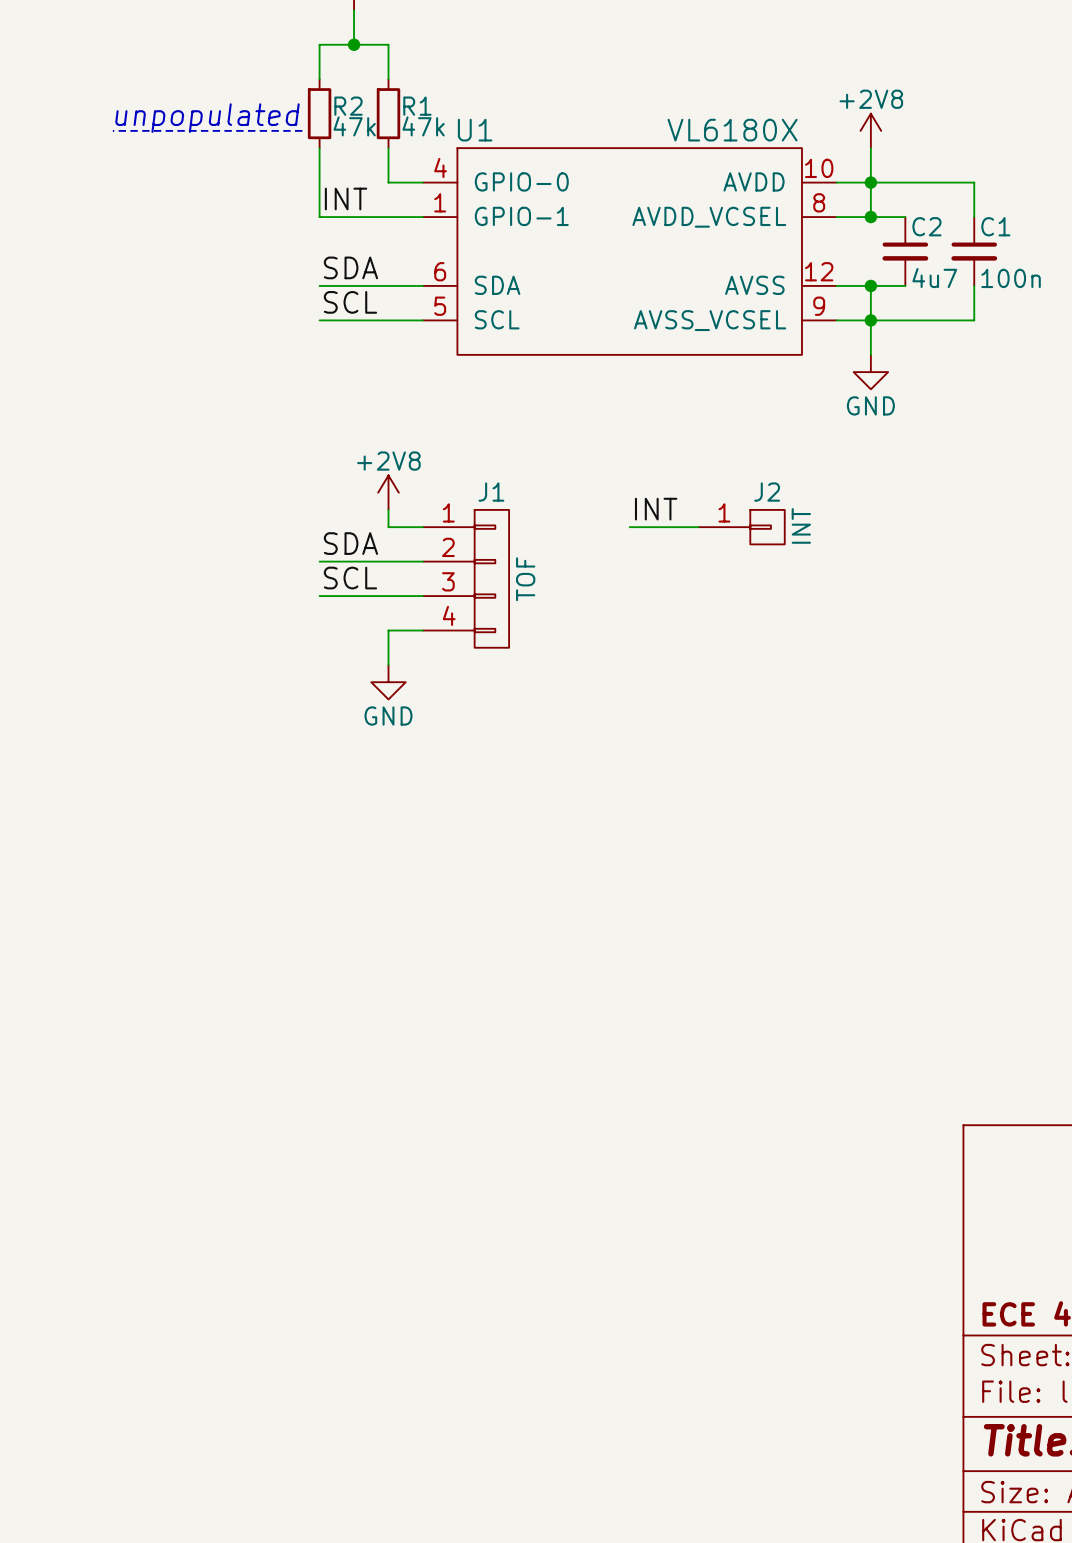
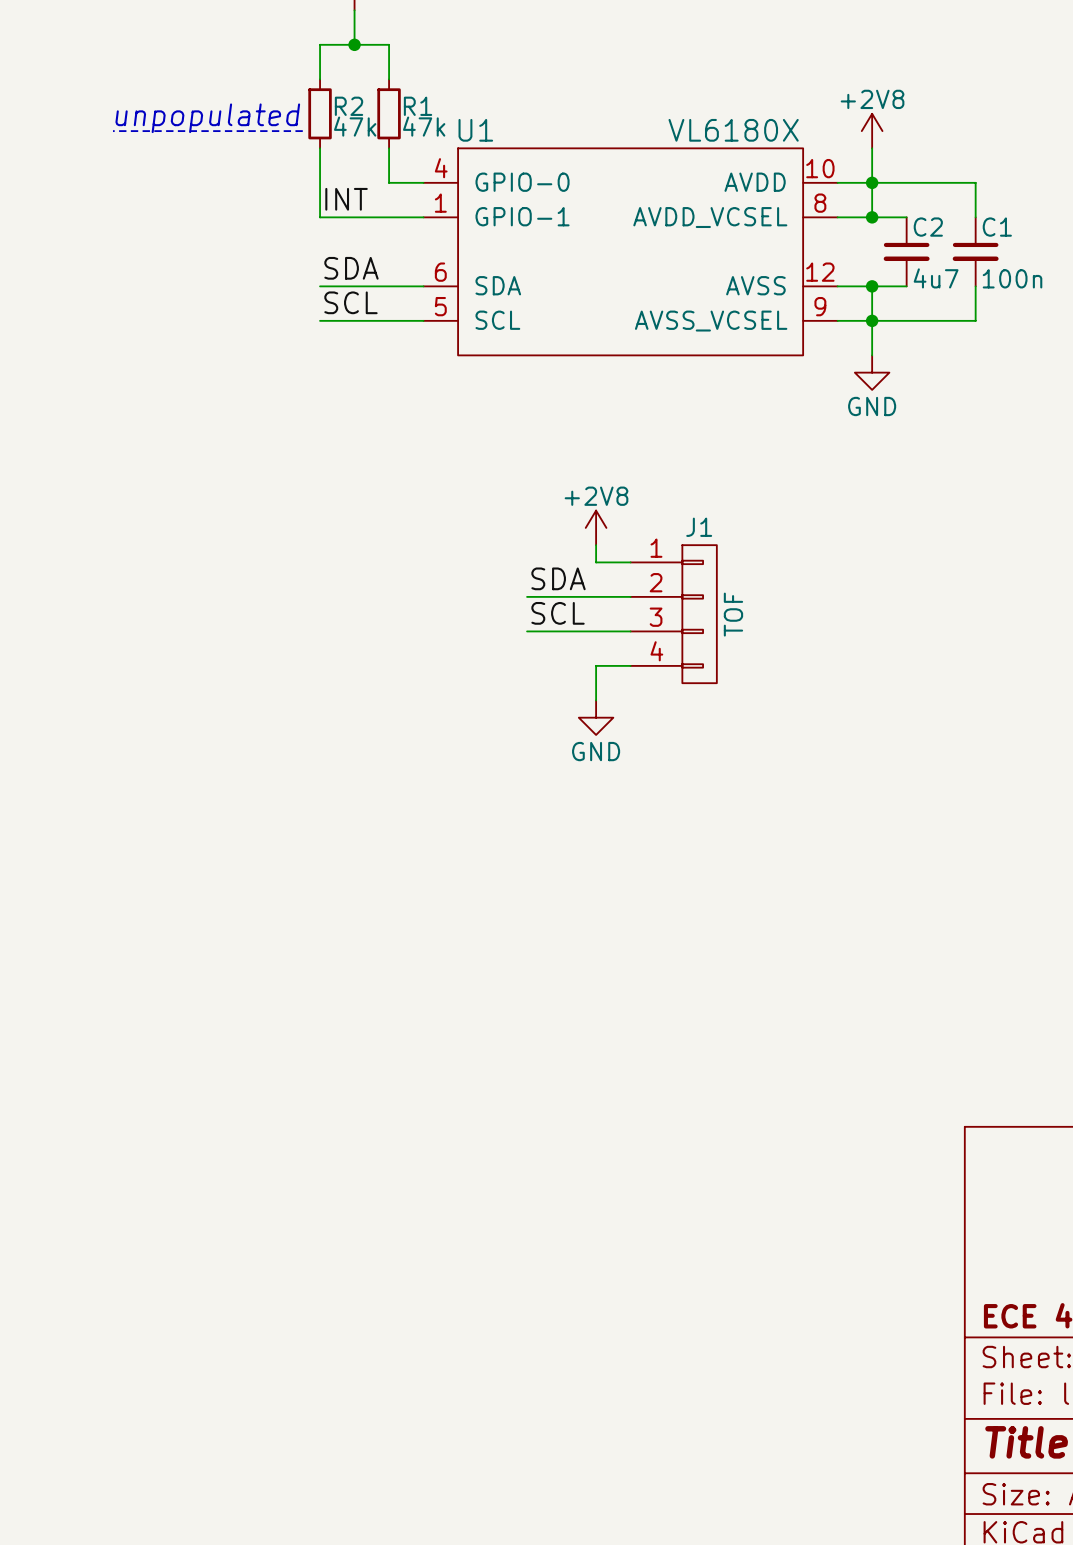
power symbol position: +2V8 (388, 492) -> +2V8 (596, 527)
wire: (388, 509) (388, 527) (422, 527) -> (596, 545) (596, 562) (630, 562)
label: INT (656, 509) -> none
wire: (629, 527) (698, 527) -> none
J2: INT (741, 527) -> none
label position: SDA (350, 543) -> SDA (558, 578)
wire: (319, 561) (422, 561) -> (527, 631) (630, 631)
label position: SCL (350, 578) -> SCL (558, 613)
J1 position: (466, 578) -> (673, 614)
wire: (319, 596) (422, 596) -> (527, 596) (630, 596)
wire: (422, 630) (388, 630) (388, 664) -> (630, 665) (596, 665) (596, 700)
power symbol position: GND (388, 682) -> GND (596, 717)

